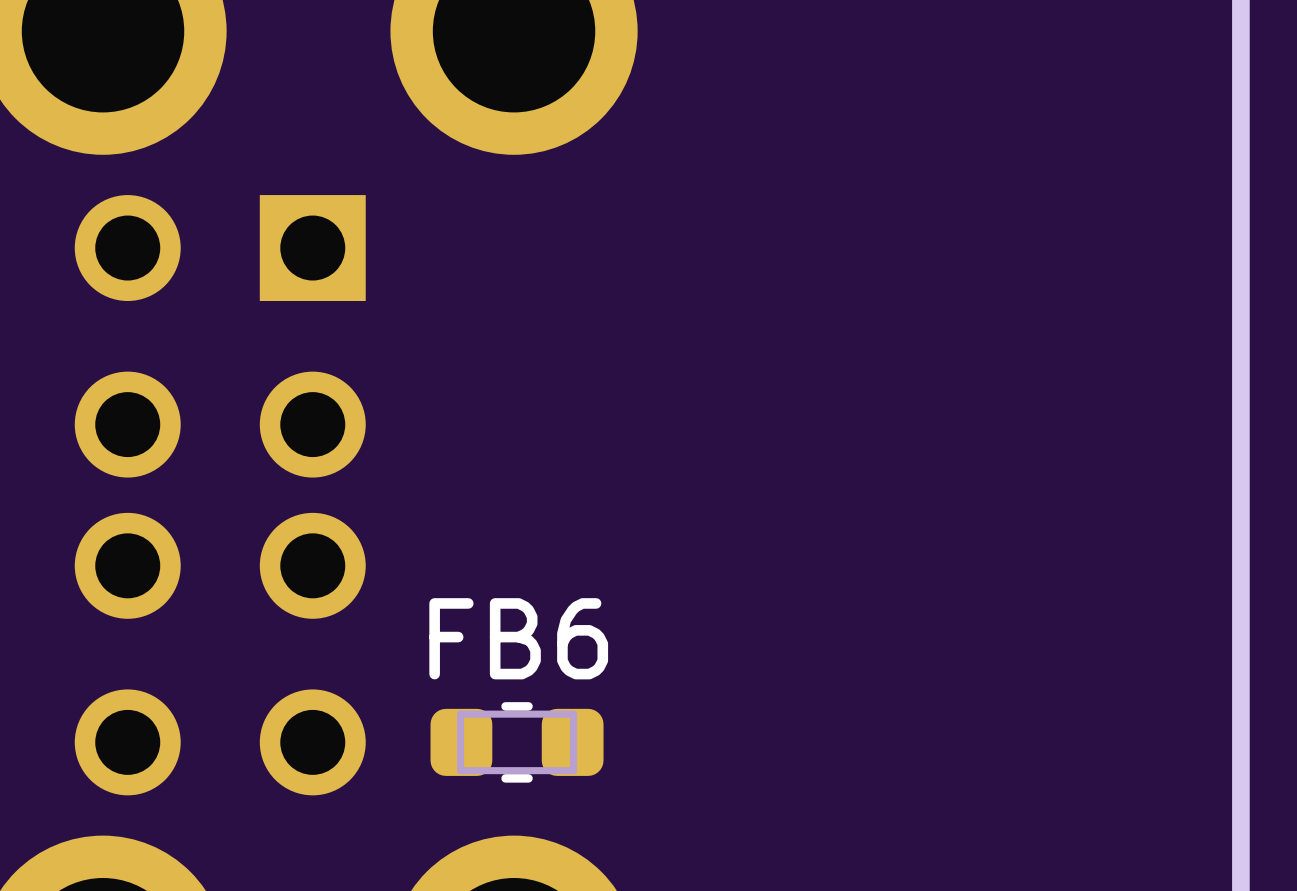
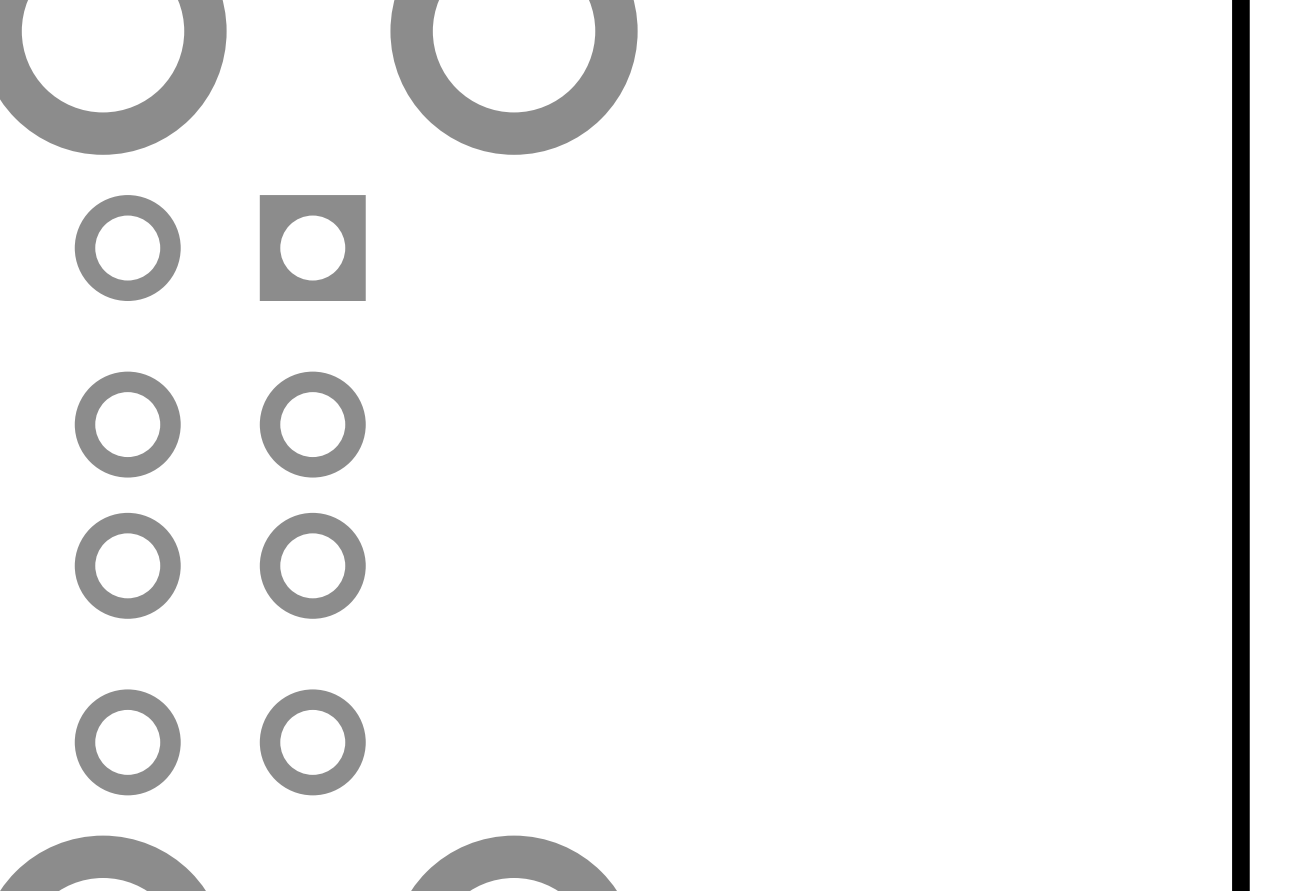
FB6: (517, 742) -> none

